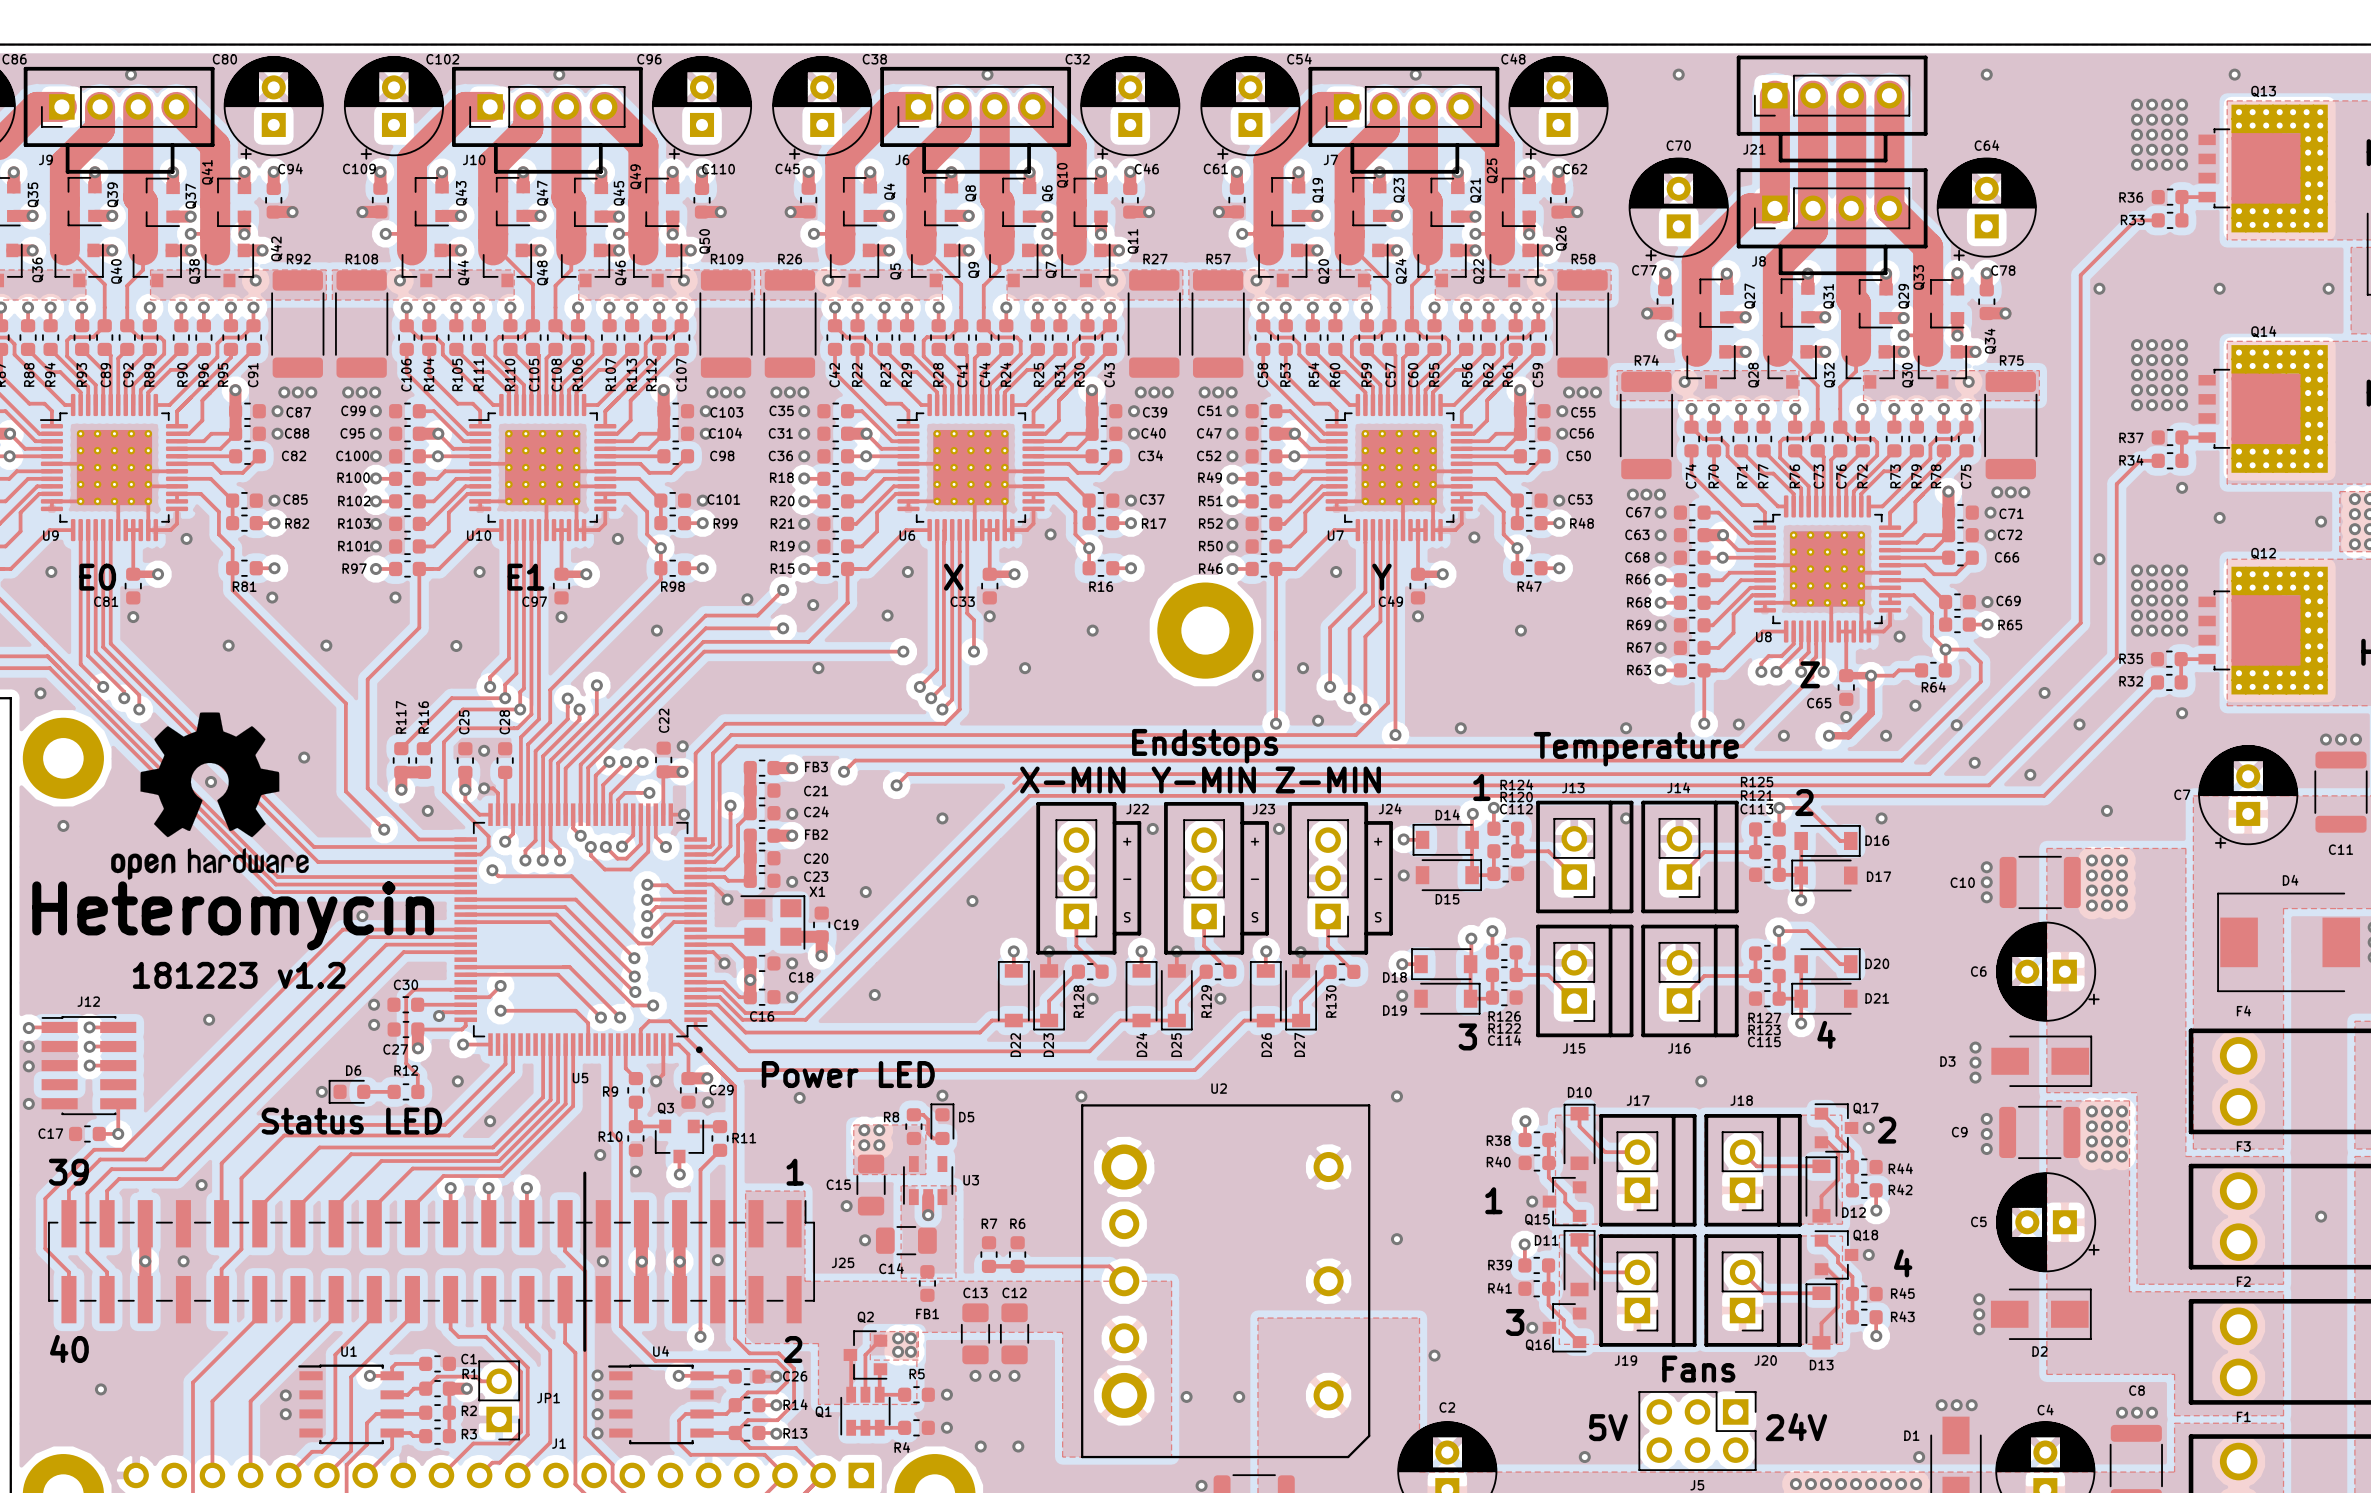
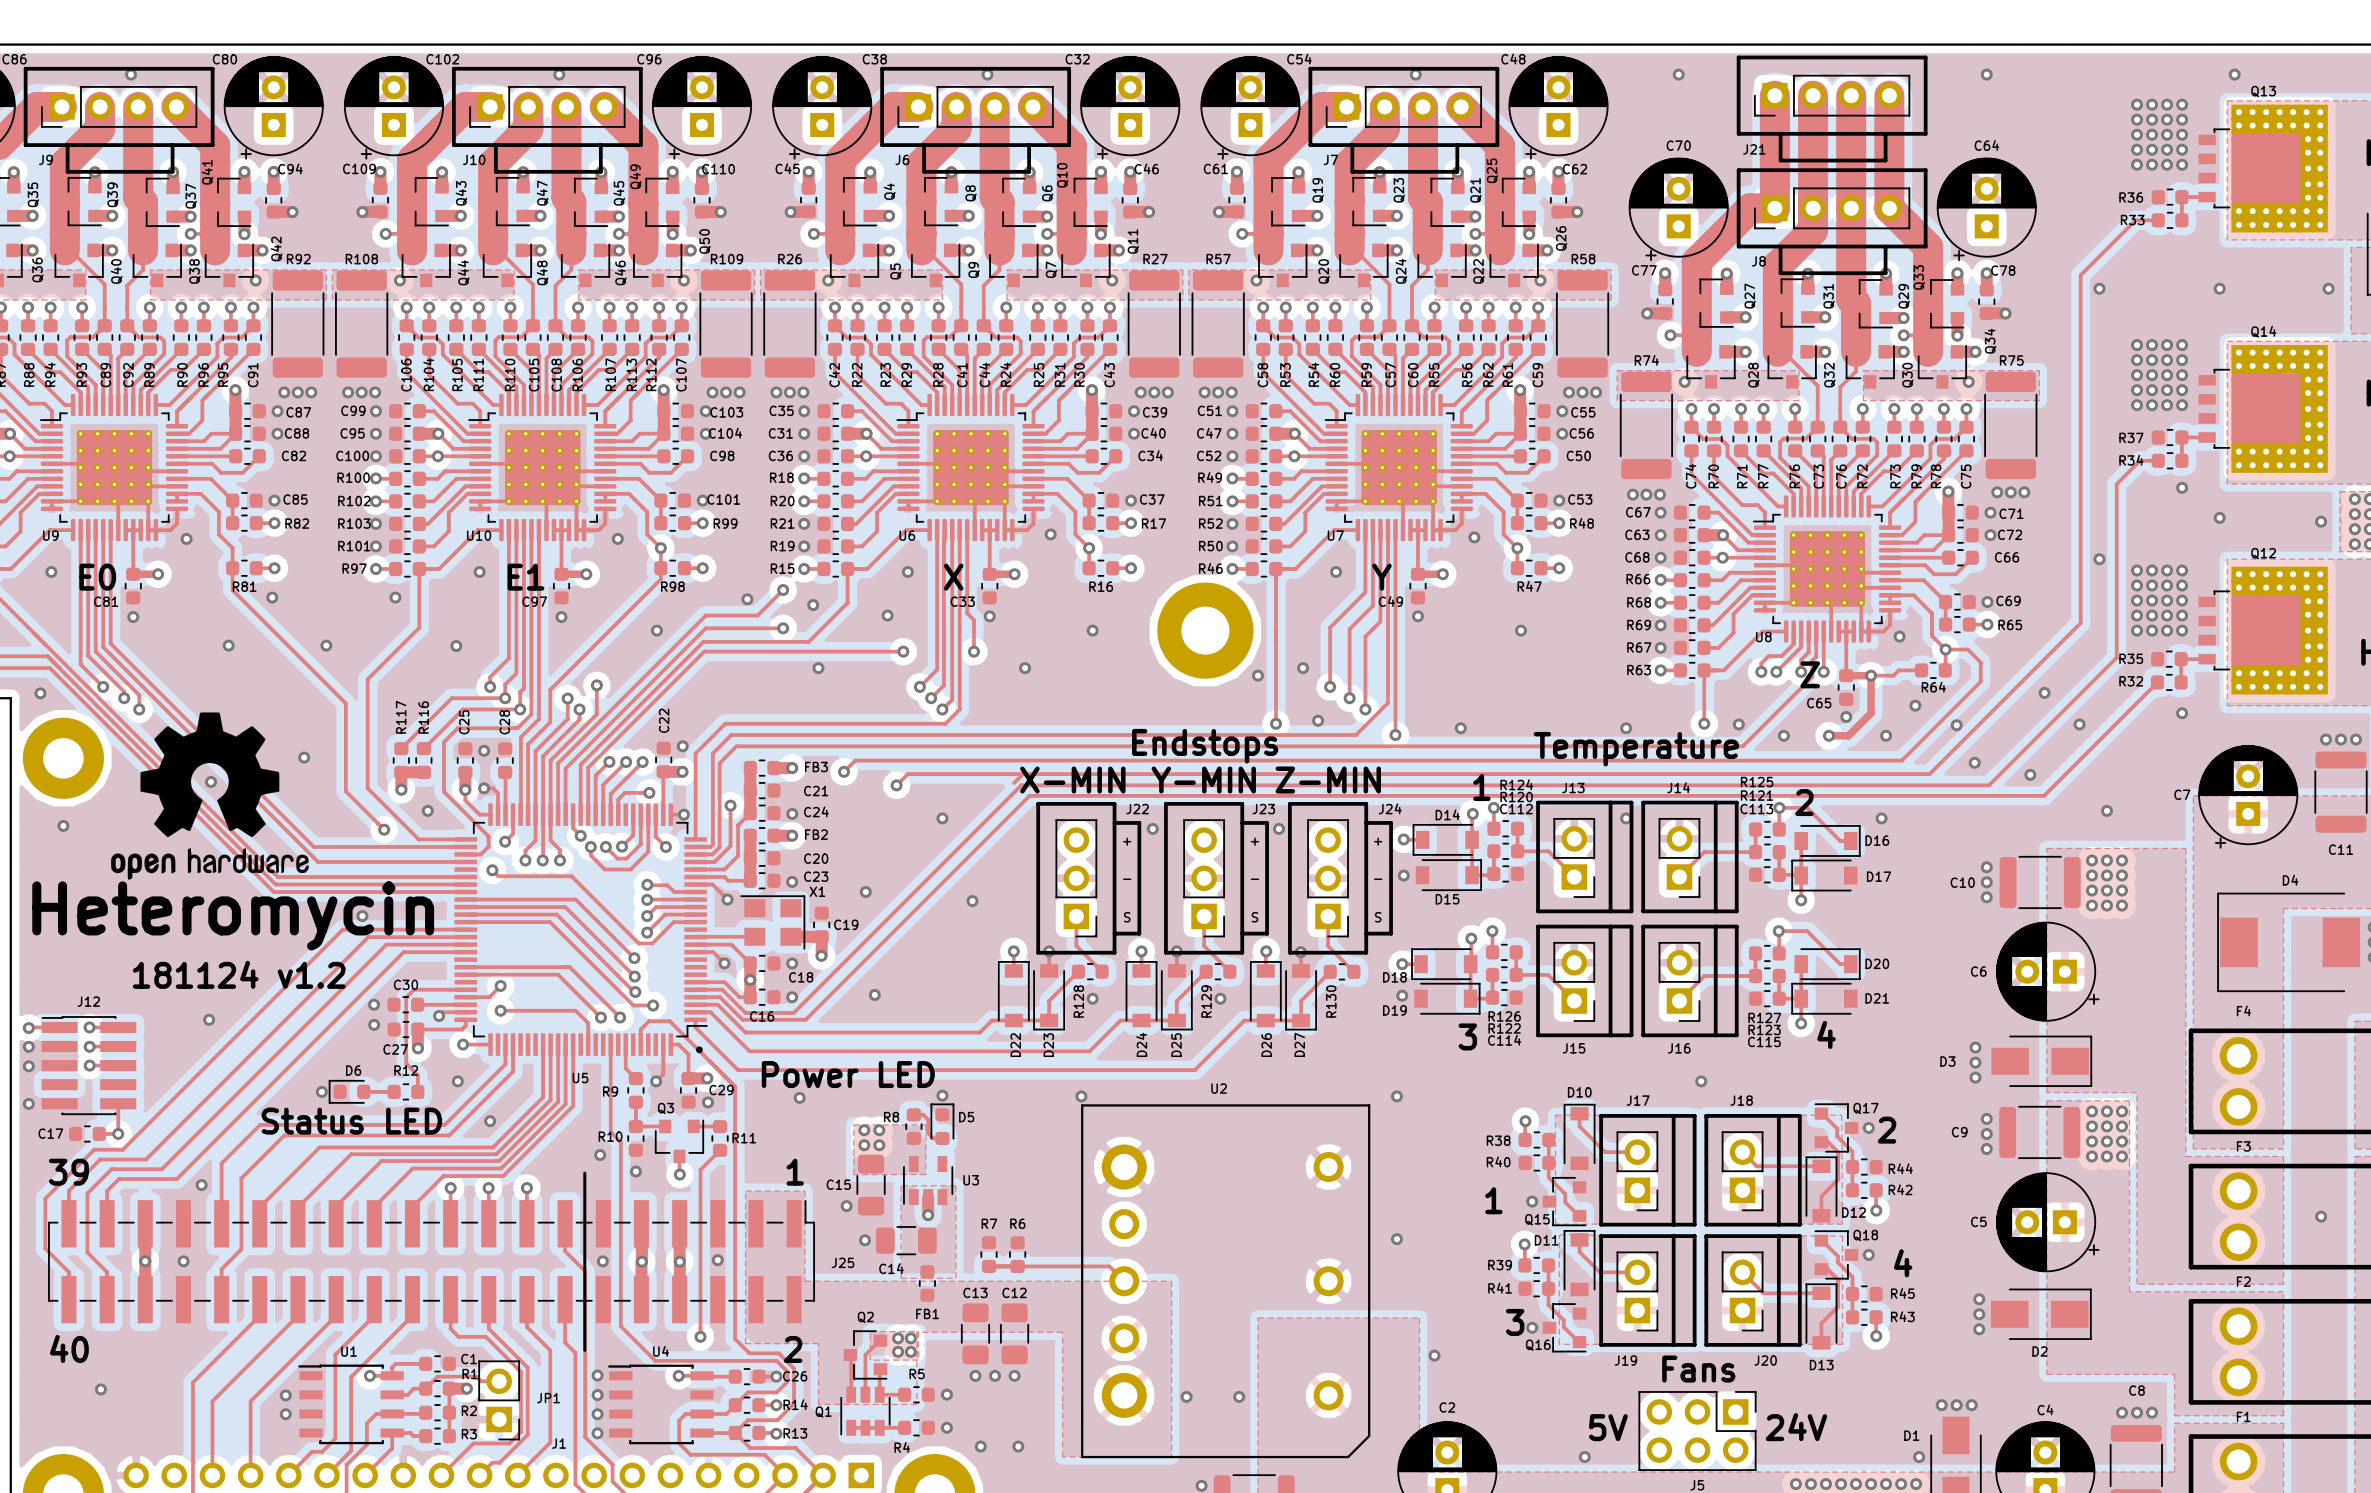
text: 181223 v1.2 (239, 975) -> 181124 v1.2 (239, 974)

